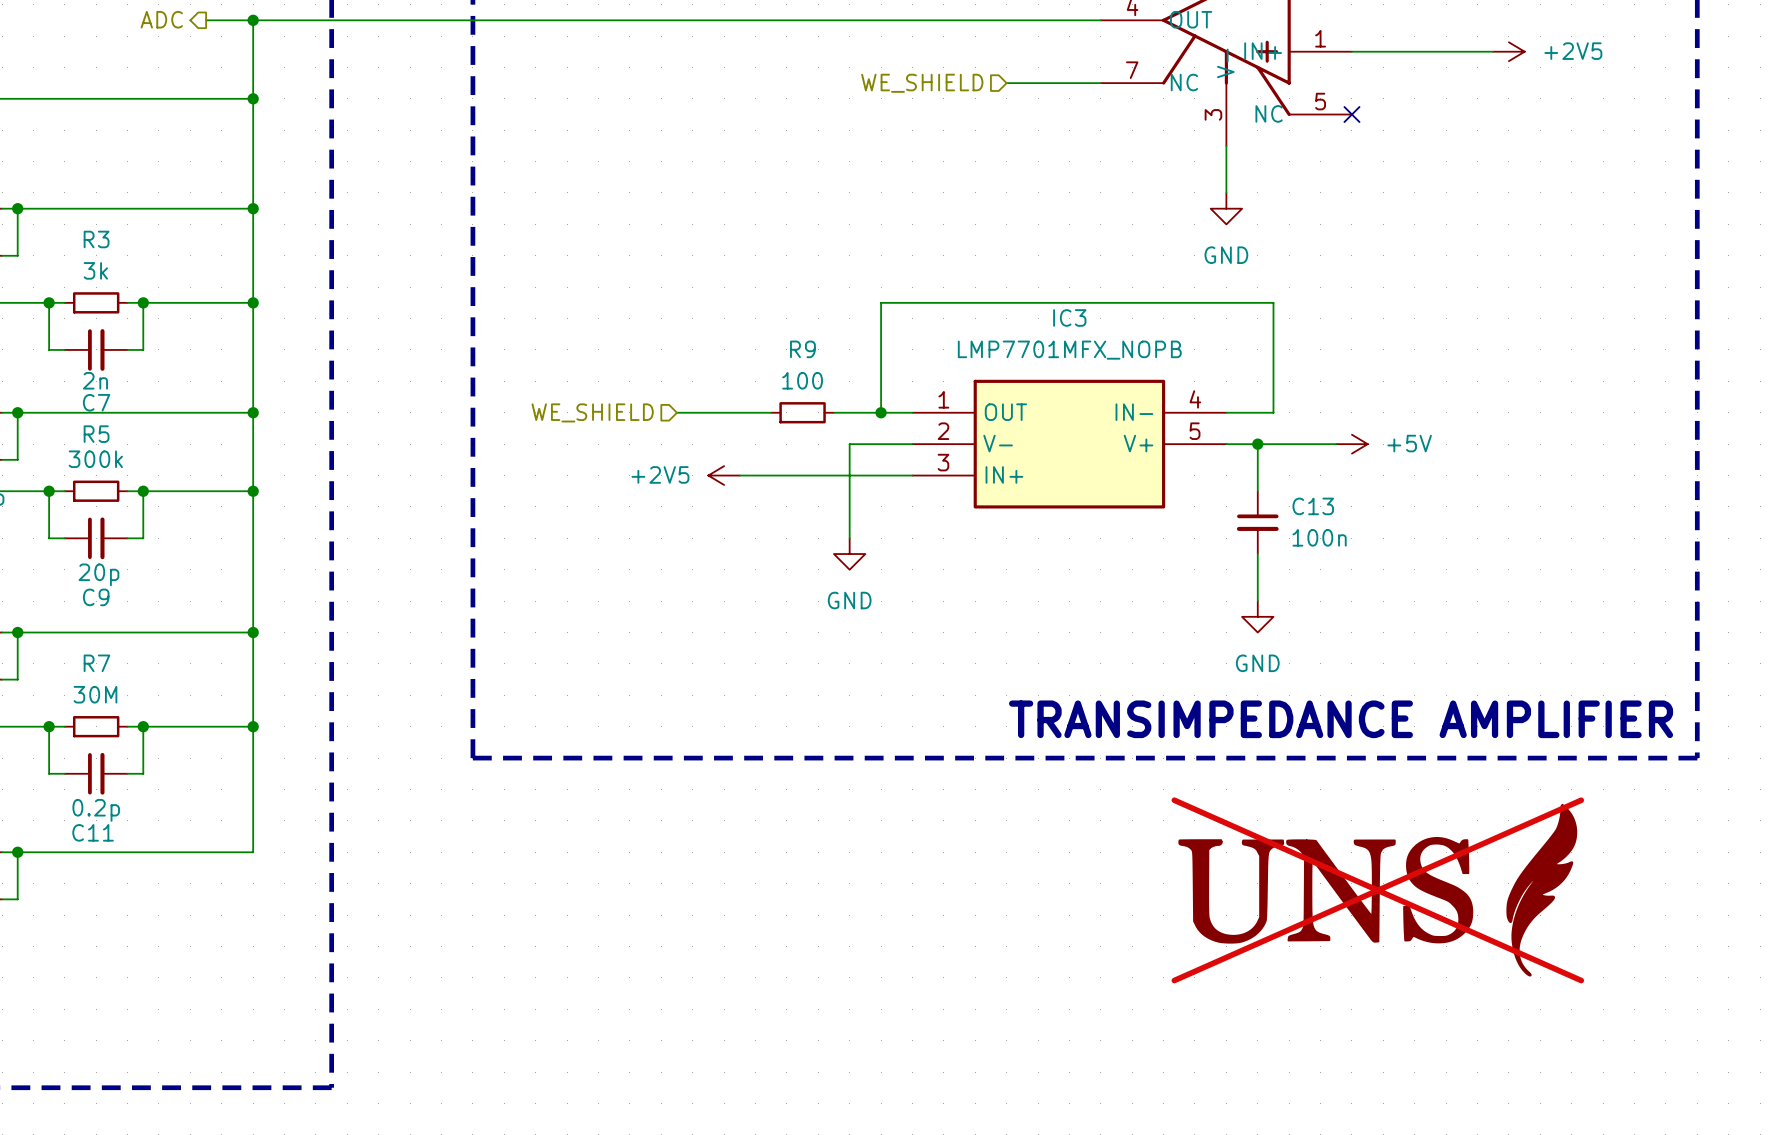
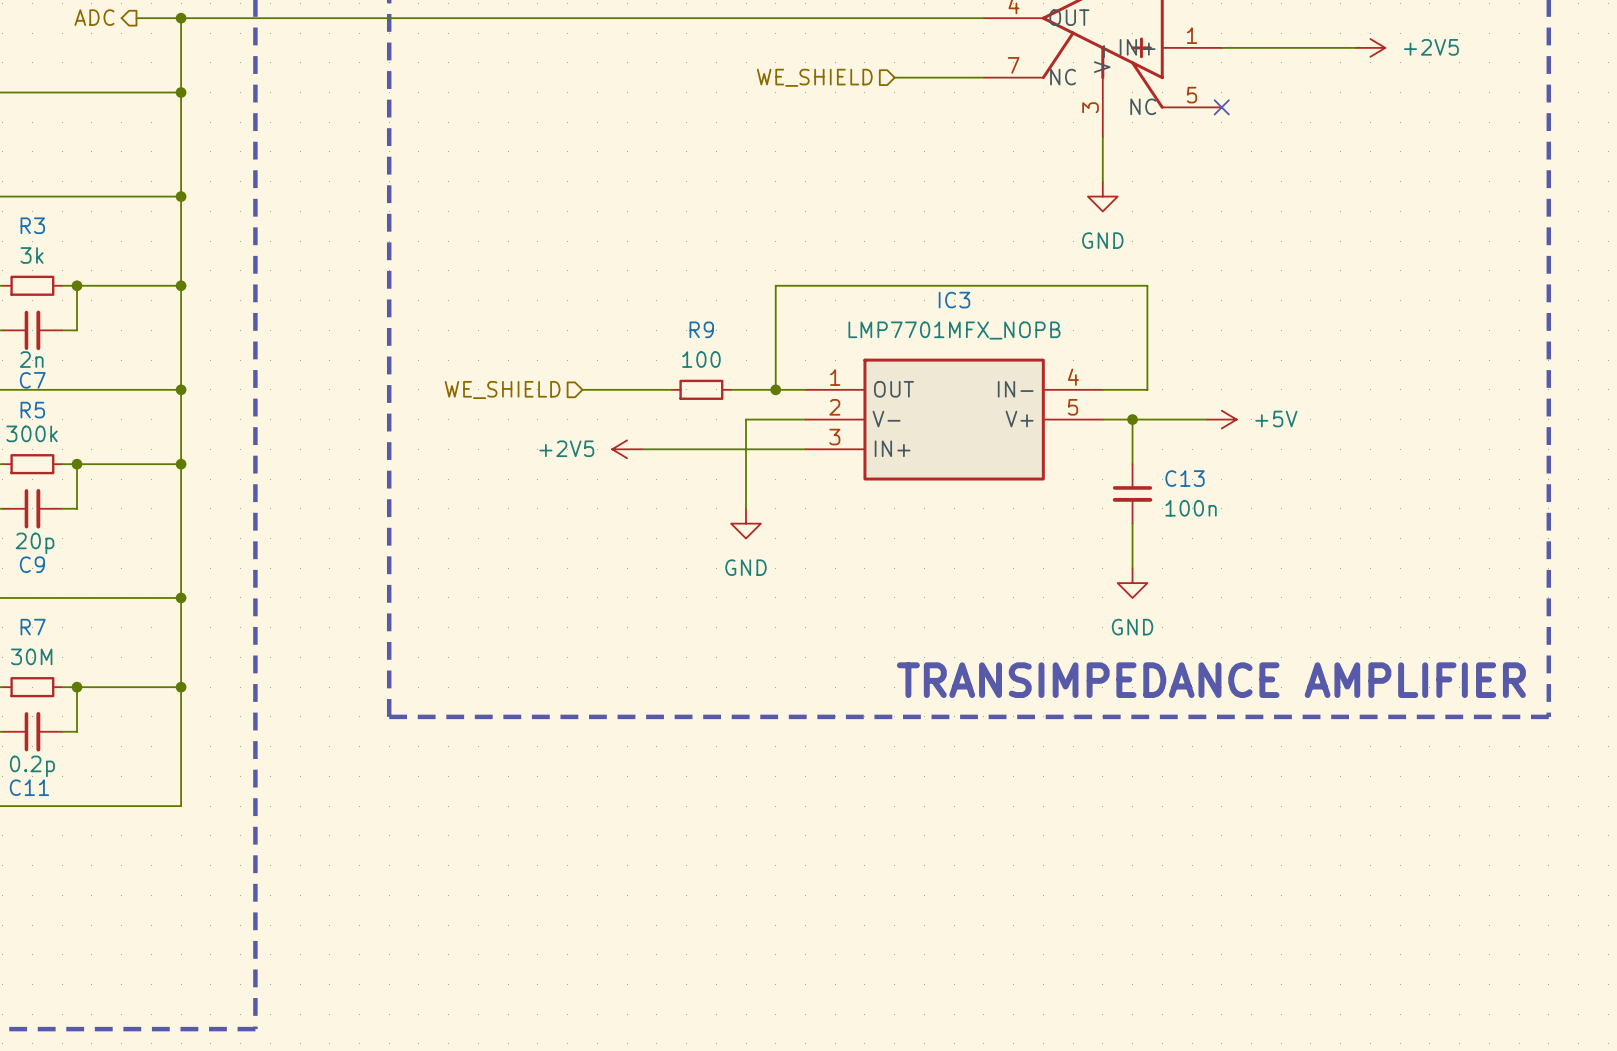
part: (1377, 890) -> none

